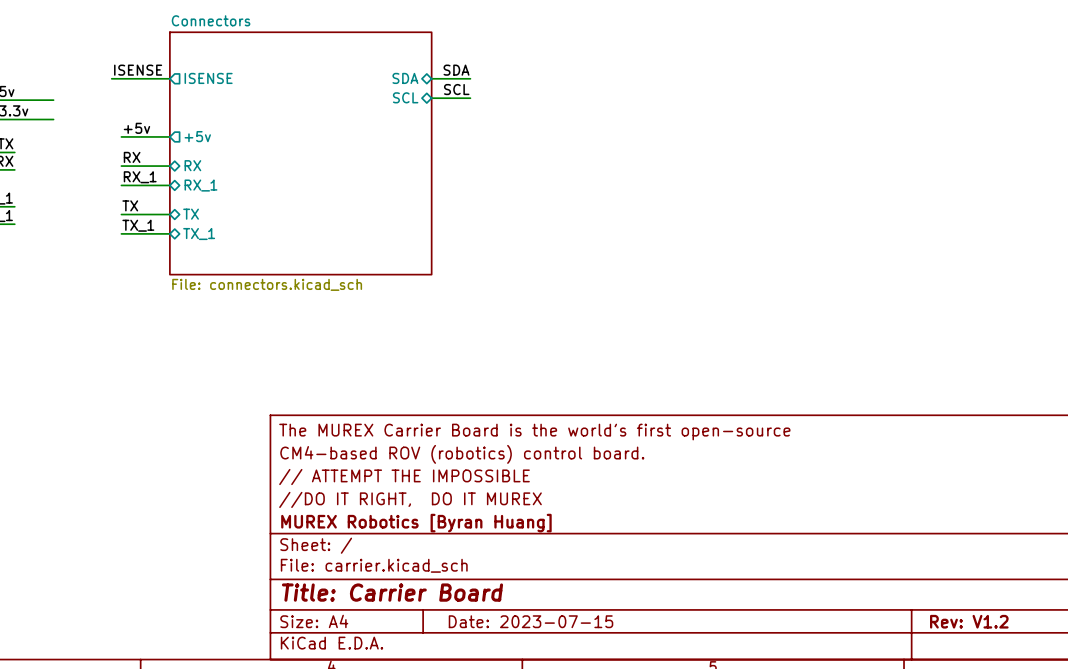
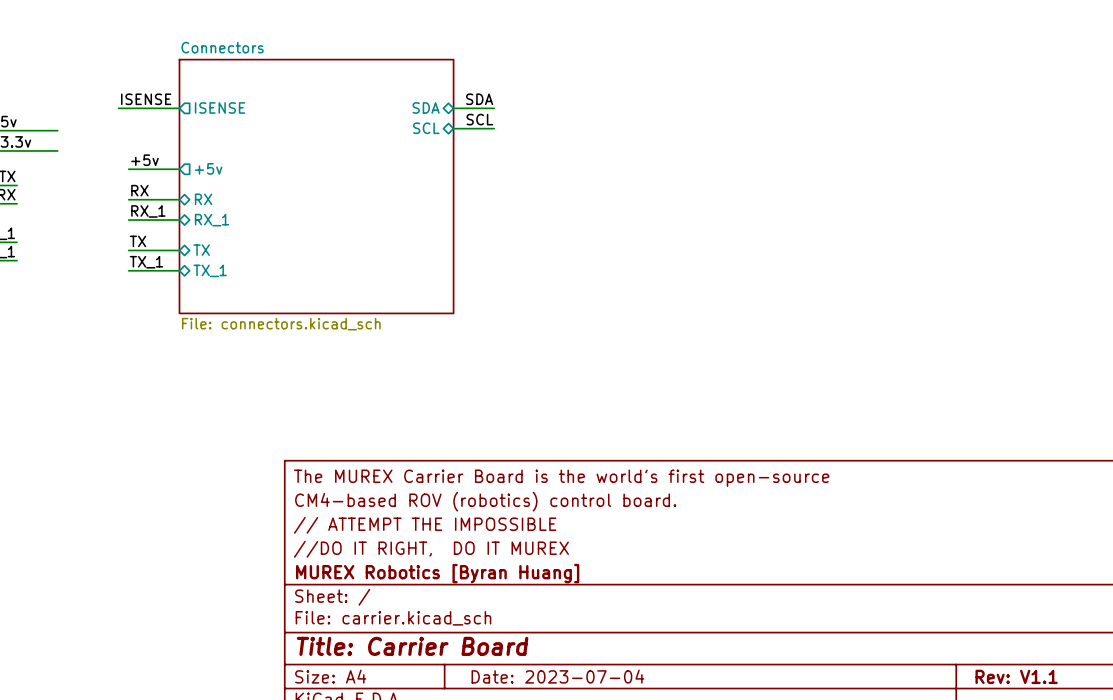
title block: Date: 2023-07-15 (531, 621) -> Date: 2023-07-04 (557, 676)
title block: Rev: V1.2 (969, 621) -> Rev: V1.1 (1016, 676)

